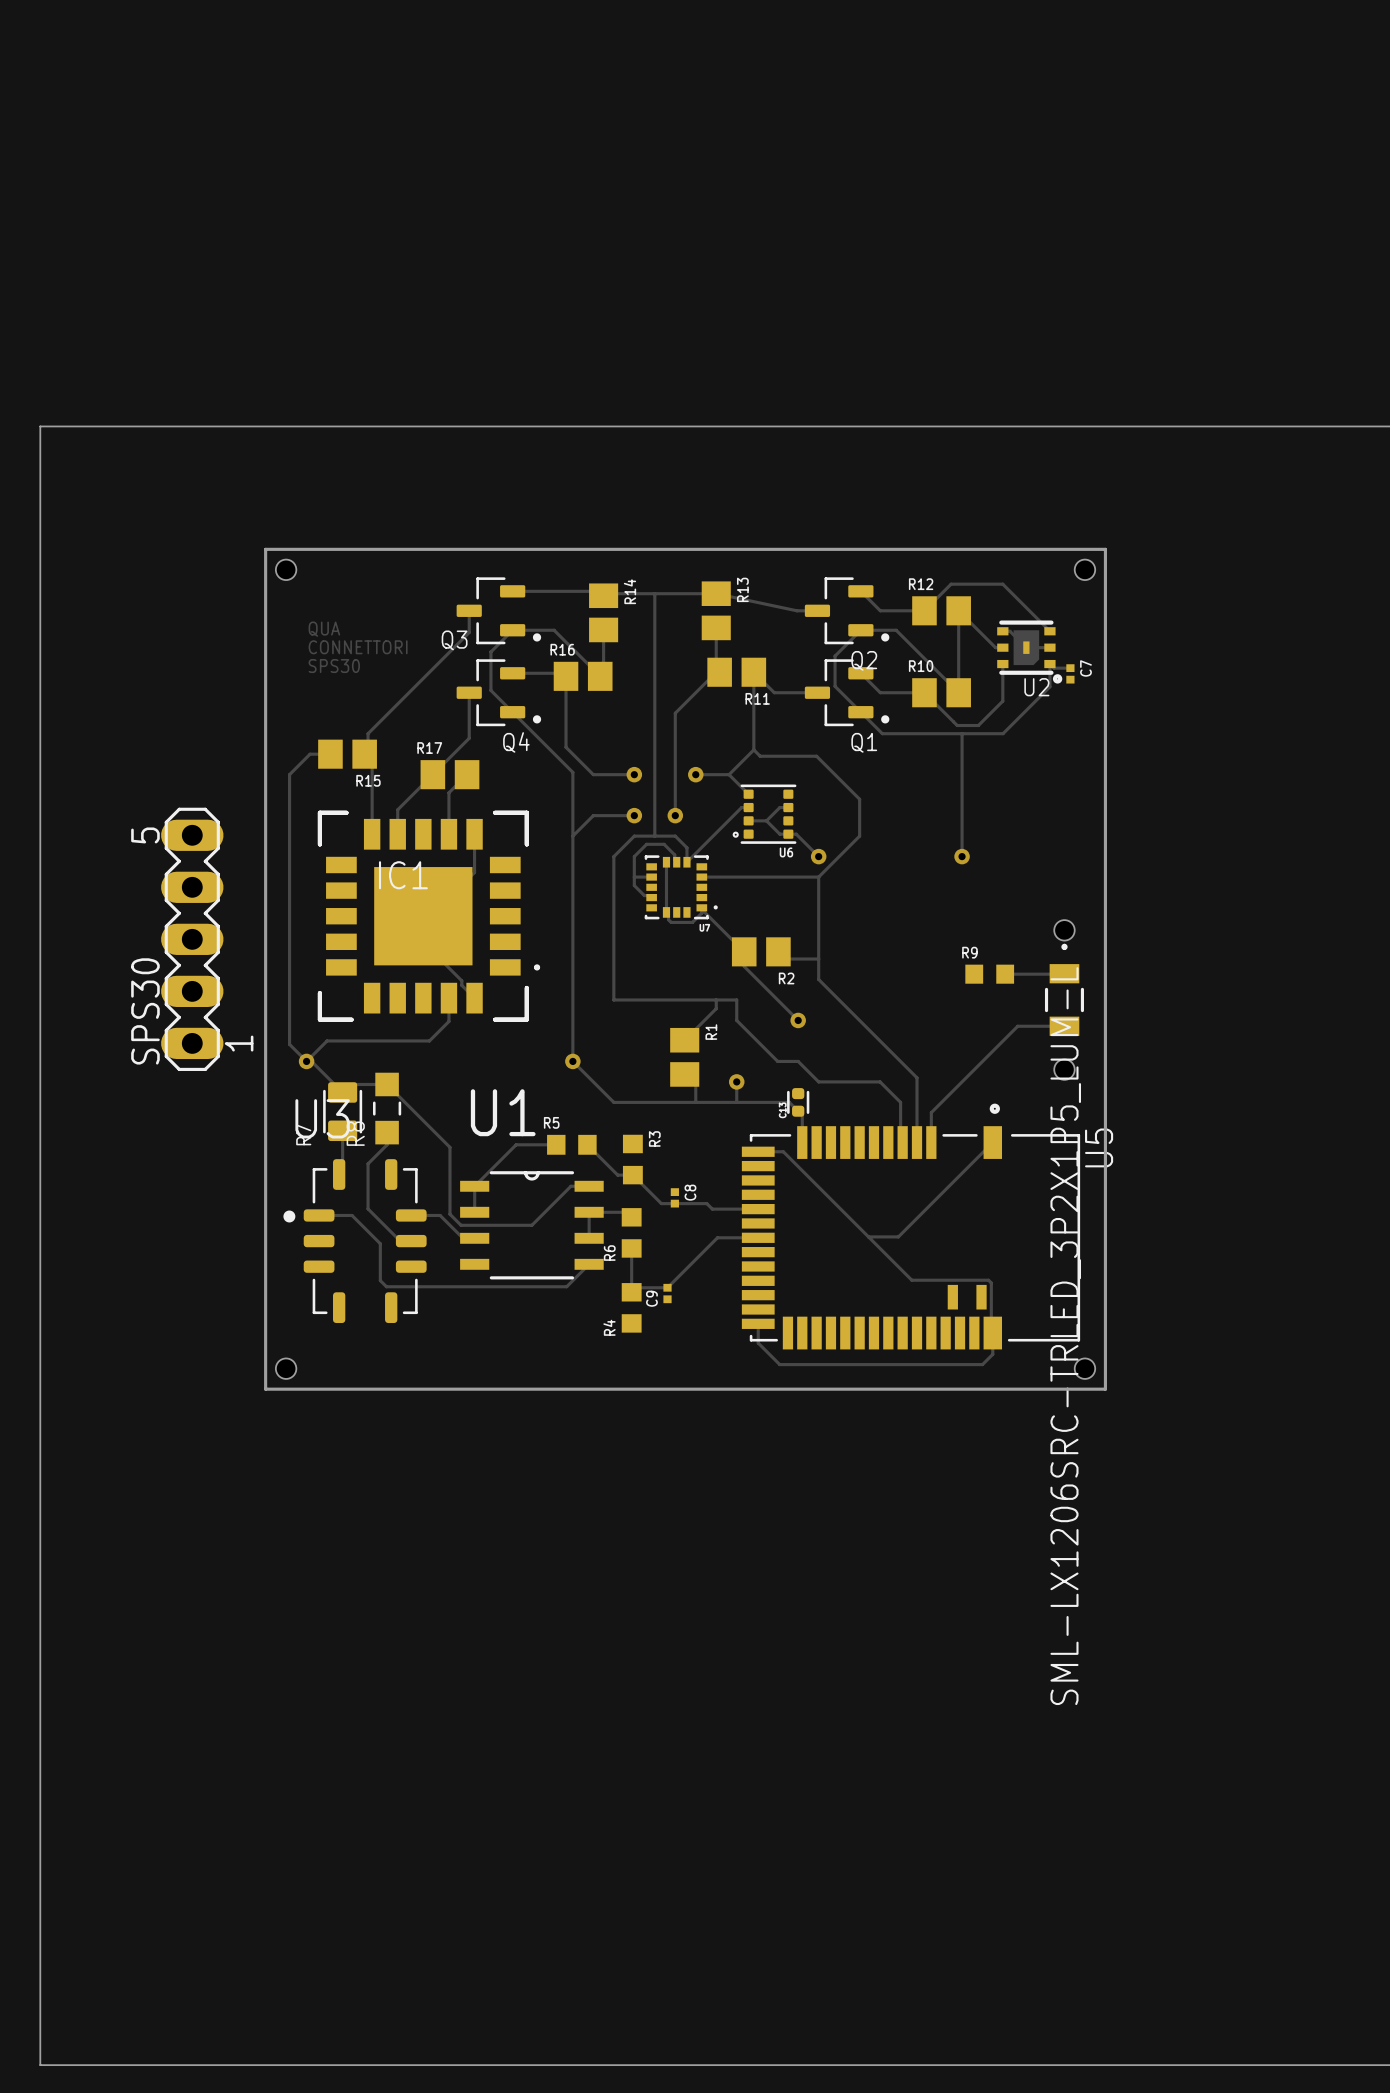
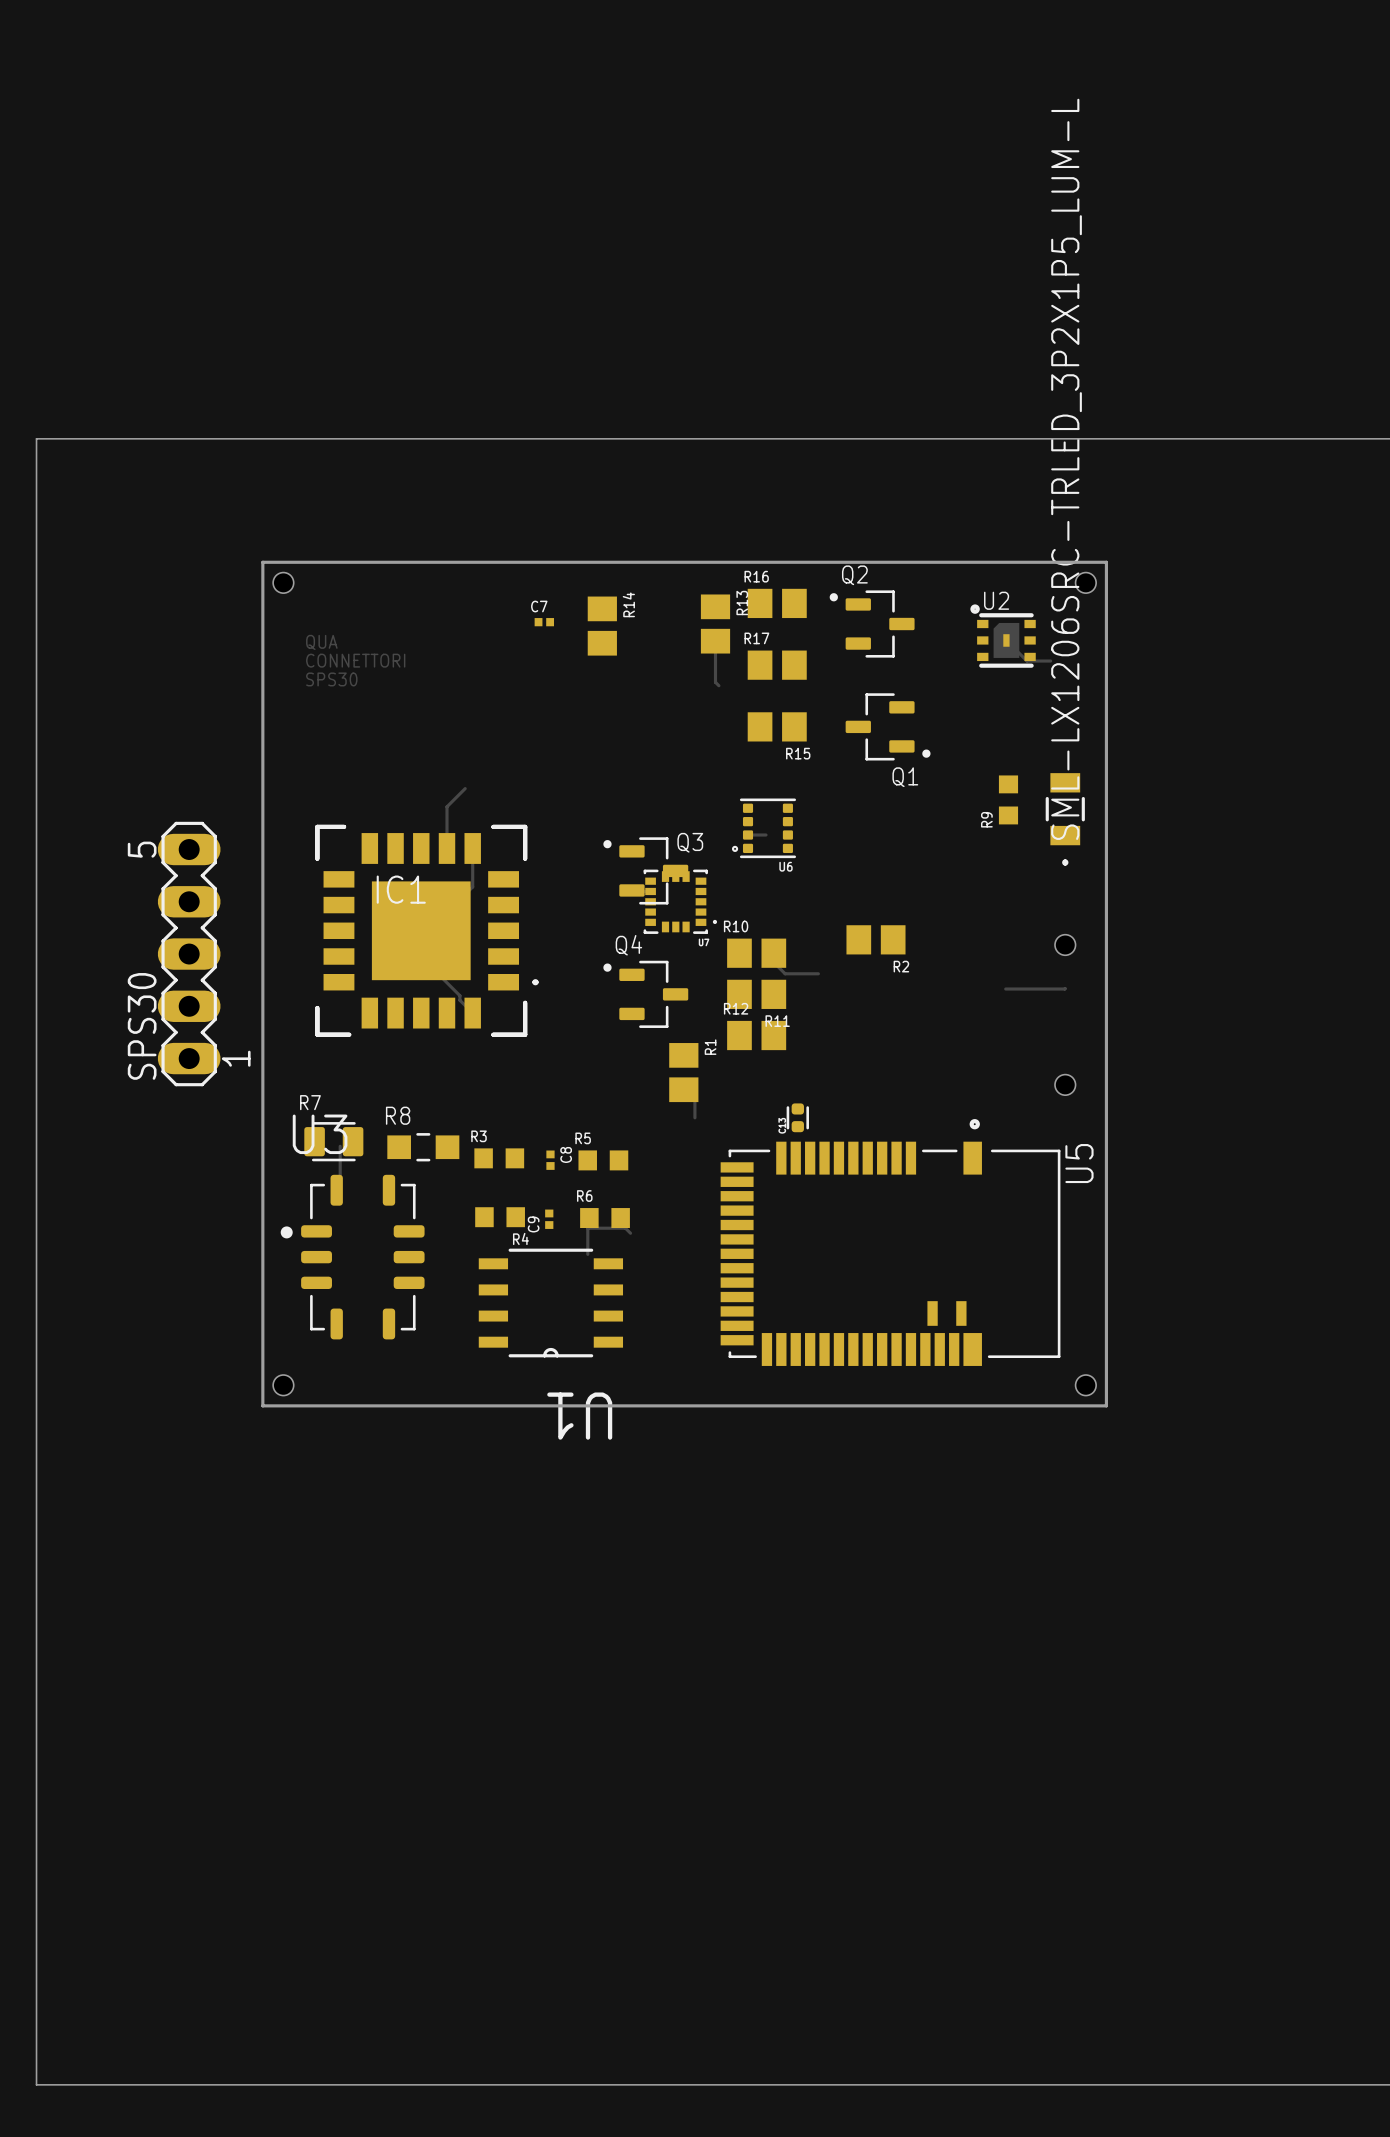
track: (512, 591) (598, 591) (603, 595) (605, 593) (716, 593) (796, 610) (817, 610) -> none
track: (860, 591) (880, 610) (924, 610) (951, 584) (1002, 584) (1049, 631) -> none
track: (654, 593) (654, 836) -> none
track: (469, 610) (469, 632) (368, 733) (368, 750) (364, 754) (372, 761) (372, 834) -> none
Q3 rotation: 0° (498, 610) -> 180° (645, 870)
Q3 position: (498, 610) -> (645, 870)
Q2 rotation: 0° (847, 610) -> 180° (872, 624)
R12 position: (941, 610) -> (756, 1035)
track: (603, 629) (603, 662) (594, 670) -> none
track: (1002, 647) (995, 647) (958, 610) (958, 692) (896, 630) (860, 630) (835, 656) (835, 686) (882, 733) (1003, 733) (1049, 686) (1049, 664) (1054, 668) (1070, 668) -> none
track: (490, 651) (490, 690) (572, 772) (572, 1061) (613, 1102) (789, 1102) (802, 1115) (802, 1142) -> none
track: (491, 651) (512, 630) (554, 630) (600, 676) -> none
U2 rotation: 0° (1029, 652) -> 180° (1003, 636)
U2 position: (1029, 652) -> (1003, 636)
track: (1002, 664) (1002, 701) (978, 725) (957, 725) (924, 692) (880, 692) (860, 673) -> none
track: (717, 670) (675, 713) (675, 815) -> none
R11 position: (736, 672) -> (756, 994)
track: (512, 673) (562, 673) (566, 676) (566, 747) (593, 774) (634, 774) -> none
C7 rotation: 0° (1070, 673) -> 90° clockwise (544, 622)
C7 position: (1070, 673) -> (544, 622)
R16 position: (583, 676) -> (777, 603)
track: (469, 692) (469, 738) (397, 809) (397, 834) -> none
Q4 rotation: 0° (498, 692) -> 180° (645, 994)
Q4 position: (498, 692) -> (645, 994)
track: (817, 692) (774, 692) (753, 672) (753, 749) -> none
Q1 position: (847, 692) -> (888, 726)
R10 position: (941, 692) -> (756, 953)
track: (962, 733) (962, 856) -> none
track: (753, 749) (729, 774) -> none
track: (753, 749) (760, 756) (816, 756) (859, 799) (859, 836) (818, 877) -> none
track: (330, 754) (310, 754) (289, 774) (289, 1044) (306, 1061) -> none
R15 position: (347, 754) -> (777, 726)
R17 position: (449, 774) -> (777, 665)
via: (634, 774) -> none
track: (695, 774) (729, 774) -> none
via: (695, 774) -> none
track: (729, 774) (748, 794) -> none
track: (748, 807) (741, 807) (686, 862) (686, 847) (675, 836) (634, 836) (613, 856) (613, 999) (736, 999) (736, 1020) (777, 1061) (798, 1061) (818, 1081) (880, 1081) (900, 1102) (900, 1140) (902, 1142) -> none
track: (788, 807) (779, 807) (766, 820) (779, 834) (796, 834) (818, 856) -> none
track: (634, 815) (593, 815) (572, 836) -> none
via: (634, 815) -> none
via: (675, 815) -> none
via: (818, 856) -> none
via: (962, 856) -> none
track: (666, 862) (666, 912) (668, 919) (671, 922) (692, 922) (701, 913) (701, 907) -> none
track: (674, 864) (676, 862) (674, 854) (664, 844) (646, 844) (634, 856) (634, 885) (644, 895) (651, 897) -> none
track: (701, 877) (818, 877) -> none
track: (818, 877) (818, 979) (917, 1077) (917, 1142) -> none
track: (701, 909) (744, 951) (744, 966) (798, 1020) -> none
R2 position: (761, 951) -> (875, 939)
R9 rotation: 0° (989, 974) -> 90° clockwise (1008, 799)
R9 position: (989, 974) -> (1008, 799)
part rotation: 0° (1064, 989) -> 180° (1065, 819)
part position: (1064, 989) -> (1065, 819)
track: (448, 998) (448, 1021) (429, 1040) (327, 1040) (306, 1061) -> none
track: (716, 999) (716, 1008) (684, 1040) -> none
via: (798, 1020) -> none
track: (1064, 1026) (1017, 1026) (931, 1112) (931, 1142) -> none
track: (306, 1061) (311, 1061) (342, 1092) (350, 1084) (387, 1084) (449, 1147) (449, 1214) (461, 1225) (531, 1225) (570, 1186) (589, 1186) -> none
via: (306, 1061) -> none
via: (572, 1061) -> none
track: (736, 1081) (736, 1102) -> none
via: (736, 1081) -> none
R8 rotation: 0° (387, 1108) -> 90° clockwise (423, 1147)
R8 position: (387, 1108) -> (423, 1147)
R7 rotation: 0° (342, 1111) -> 90° clockwise (333, 1141)
track: (388, 1134) (387, 1132) (387, 1144) (368, 1163) (368, 1208) (400, 1241) (411, 1241) -> none
track: (992, 1142) (898, 1236) (868, 1236) -> none
track: (556, 1144) (516, 1144) (474, 1186) (474, 1212) -> none
R5 position: (571, 1144) -> (603, 1160)
track: (587, 1144) (617, 1175) (632, 1175) (661, 1203) (706, 1203) (712, 1209) (758, 1209) -> none
track: (758, 1151) (783, 1151) (911, 1280) (988, 1280) (991, 1282) (992, 1354) (982, 1364) (779, 1364) (758, 1343) (758, 1323) -> none
R3 rotation: 0° (632, 1159) -> 90° clockwise (499, 1158)
R3 position: (632, 1159) -> (499, 1158)
C8 position: (674, 1197) -> (550, 1160)
track: (319, 1215) (352, 1215) (380, 1243) (380, 1280) (386, 1286) (566, 1286) (589, 1264) -> none
track: (411, 1215) (440, 1215) (462, 1238) (474, 1238) -> none
U1 rotation: 0° (531, 1225) -> 180° (550, 1302)
U5 position: (910, 1226) -> (890, 1242)
R6 rotation: 0° (631, 1232) -> 90° clockwise (605, 1218)
R6 position: (631, 1232) -> (605, 1218)
track: (758, 1237) (717, 1237) (667, 1287) (636, 1287) (631, 1292) (631, 1248) -> none
C9 position: (667, 1293) -> (549, 1219)
R4 rotation: 0° (631, 1307) -> 90° clockwise (500, 1217)
R4 position: (631, 1307) -> (500, 1217)

